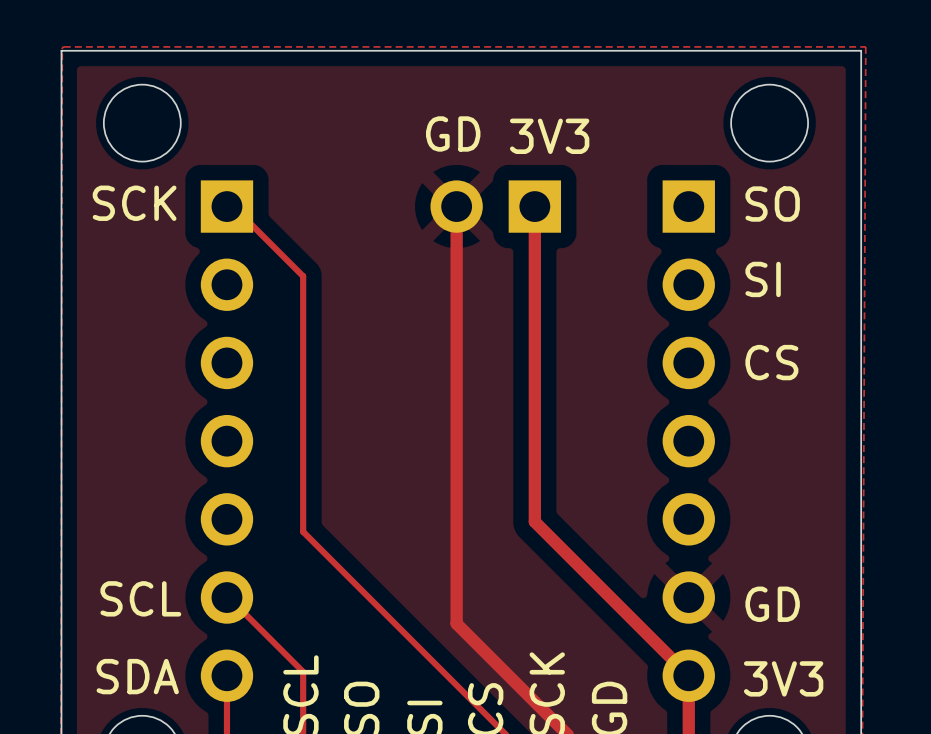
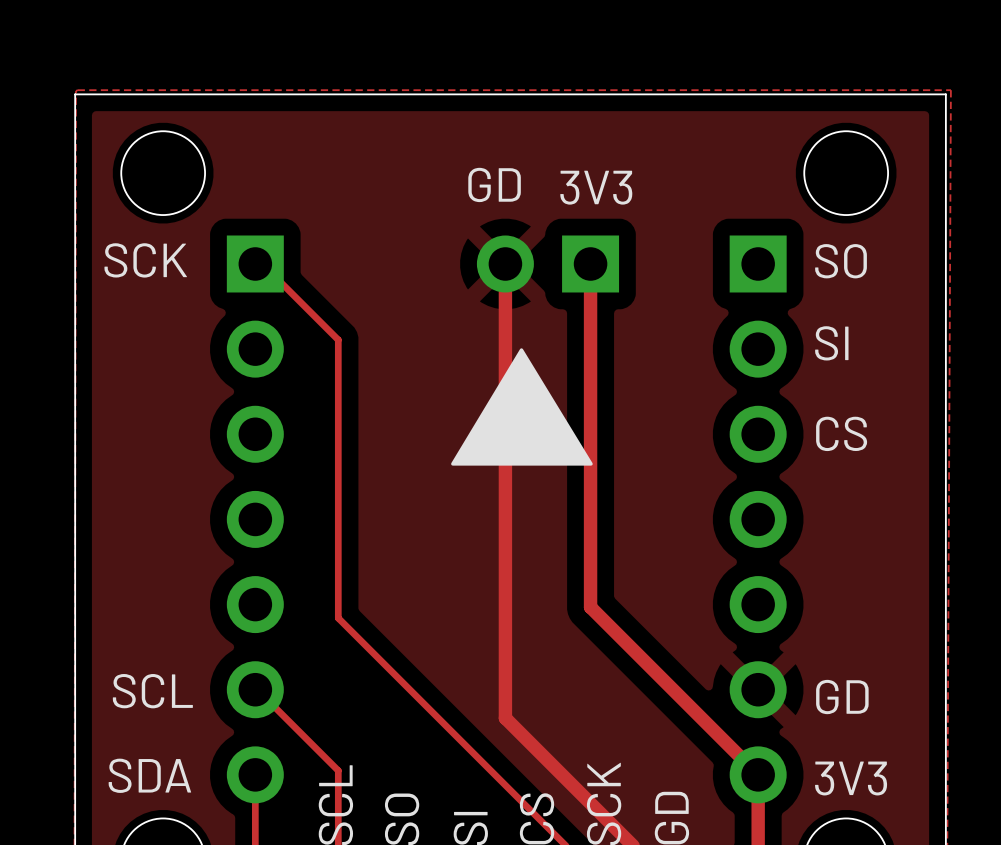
drawing: none -> [451, 348, 593, 466]

